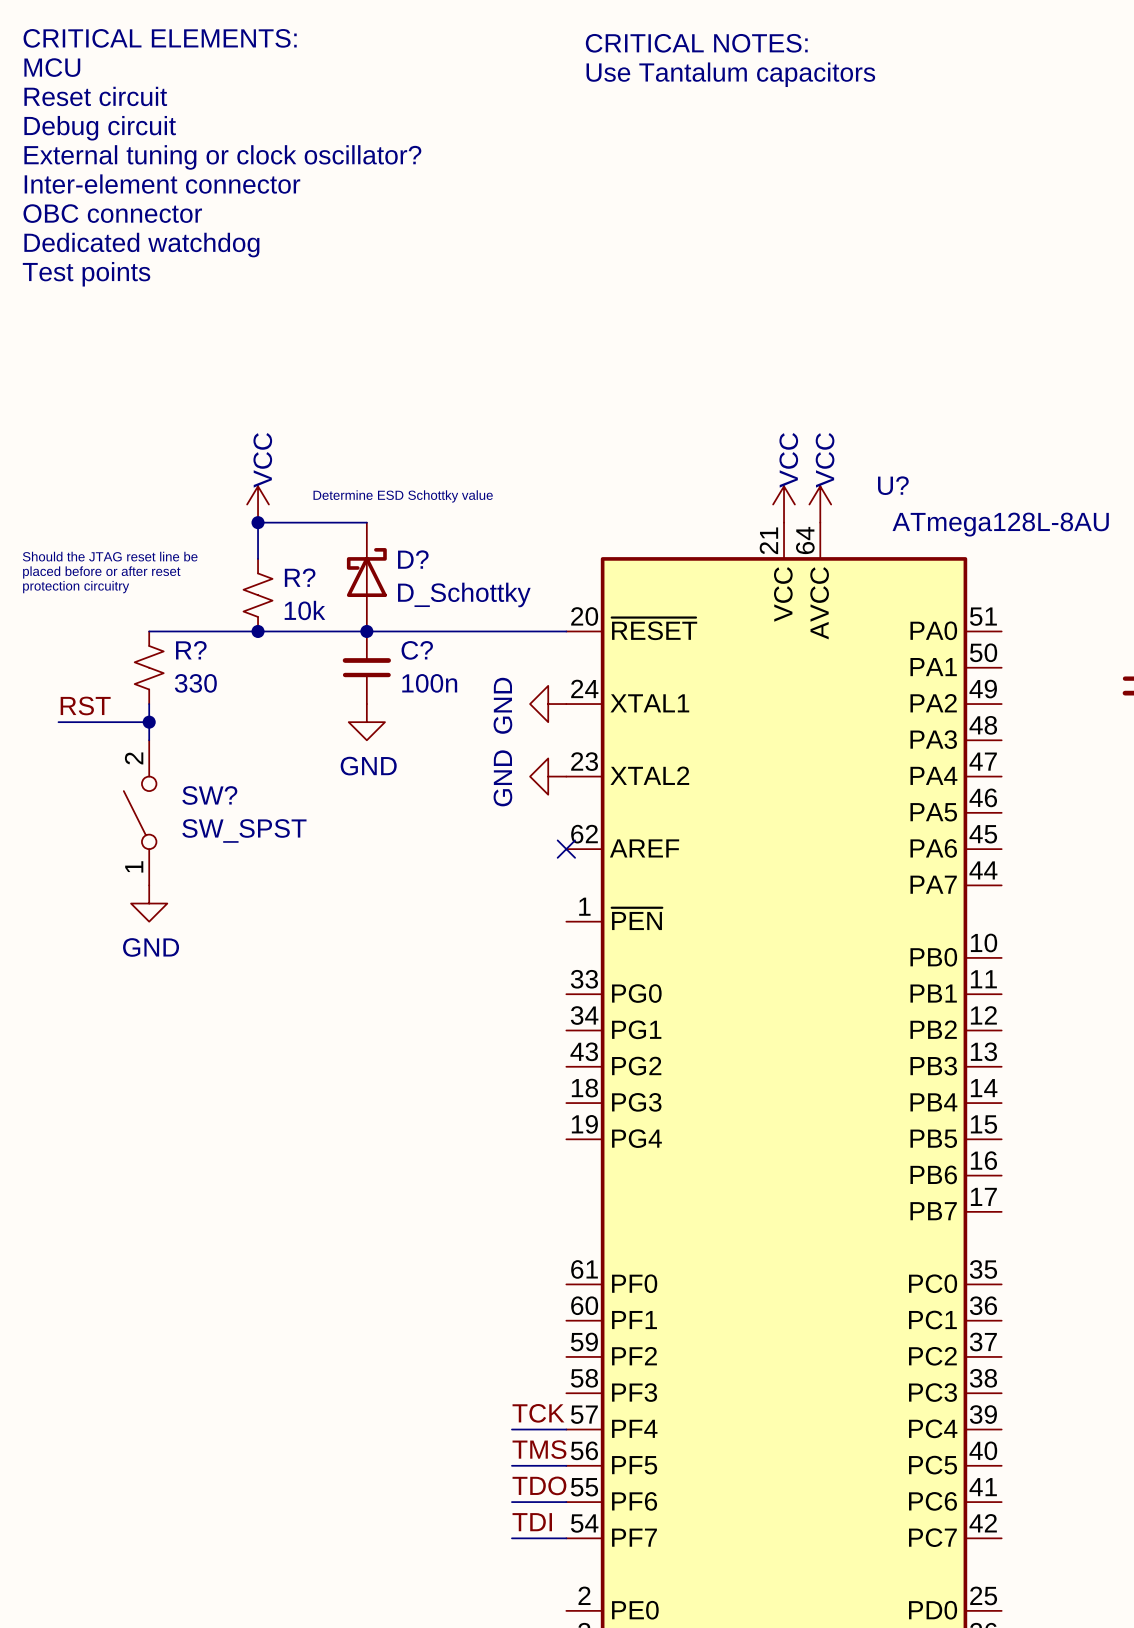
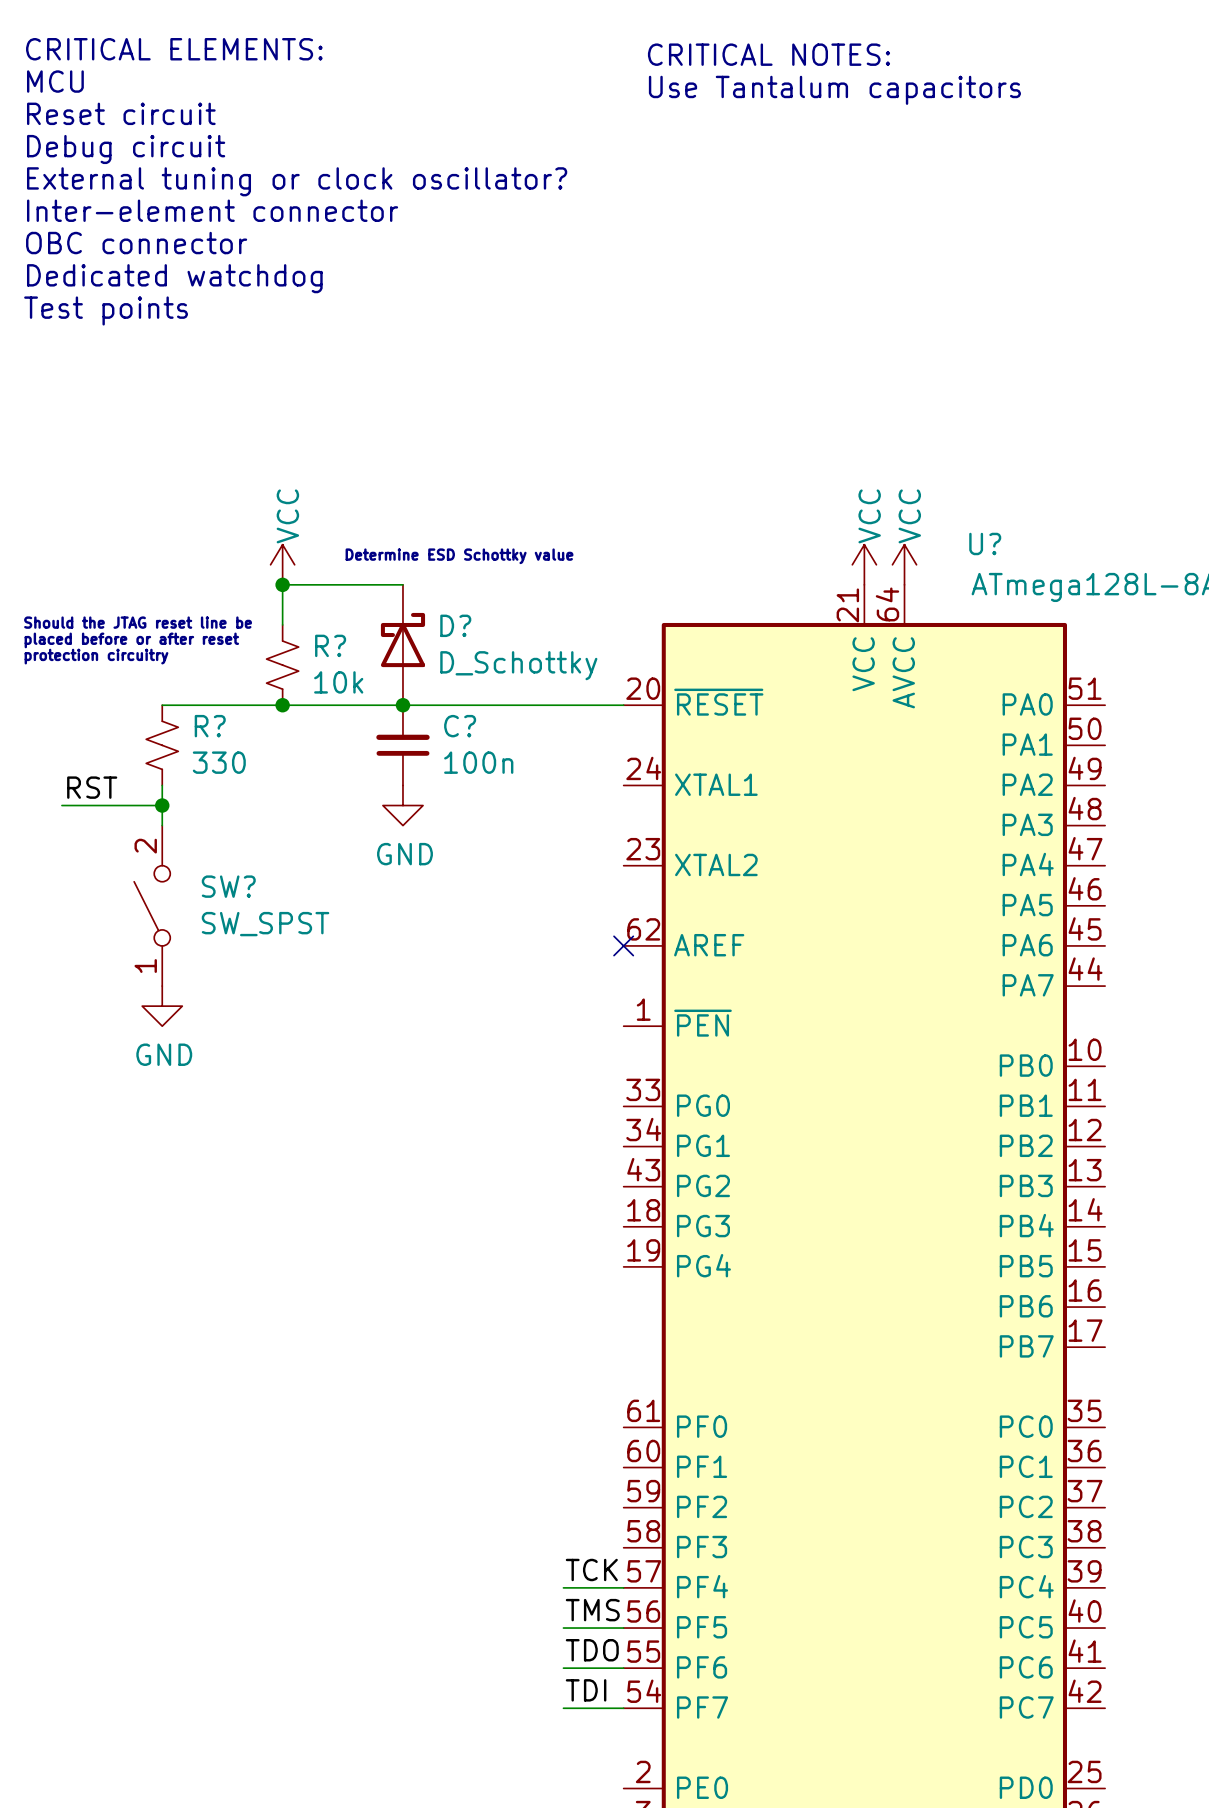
power symbol: GND (548, 704) -> none
power symbol: GND (548, 776) -> none

